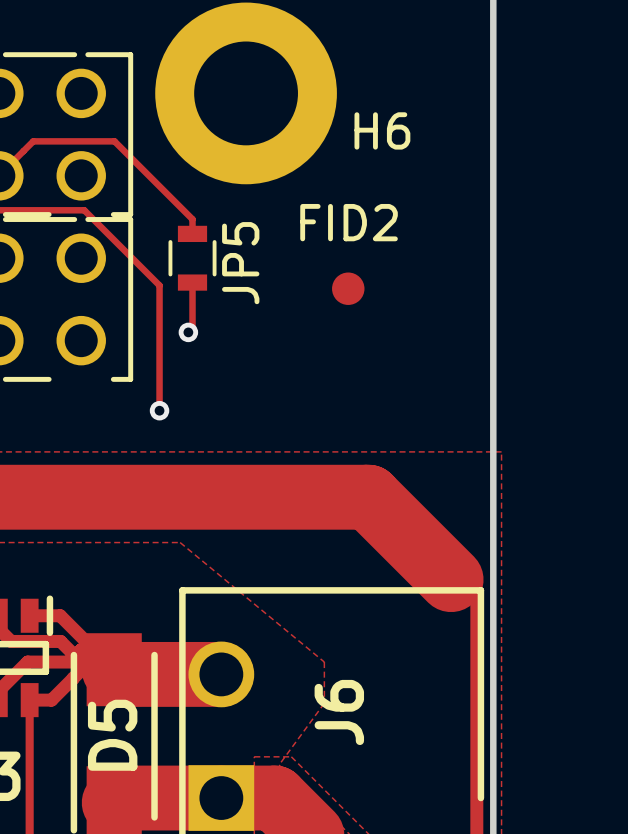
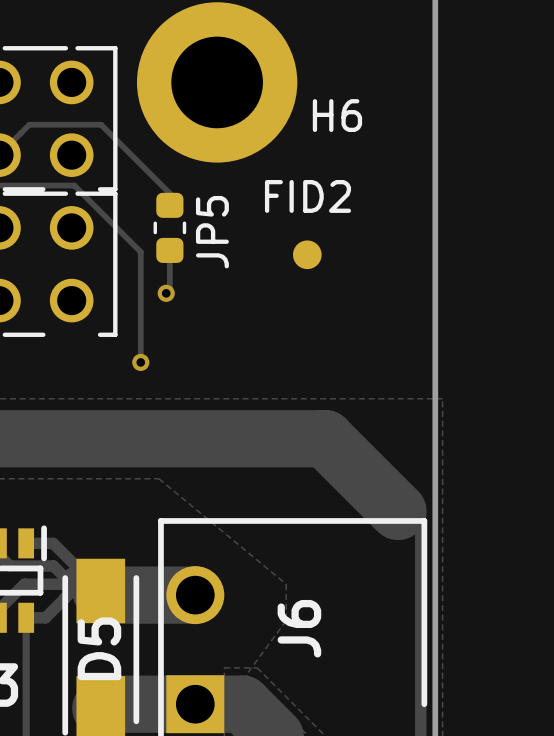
JP5 footprint: [168, 225, 217, 291] -> [153, 192, 187, 263]

